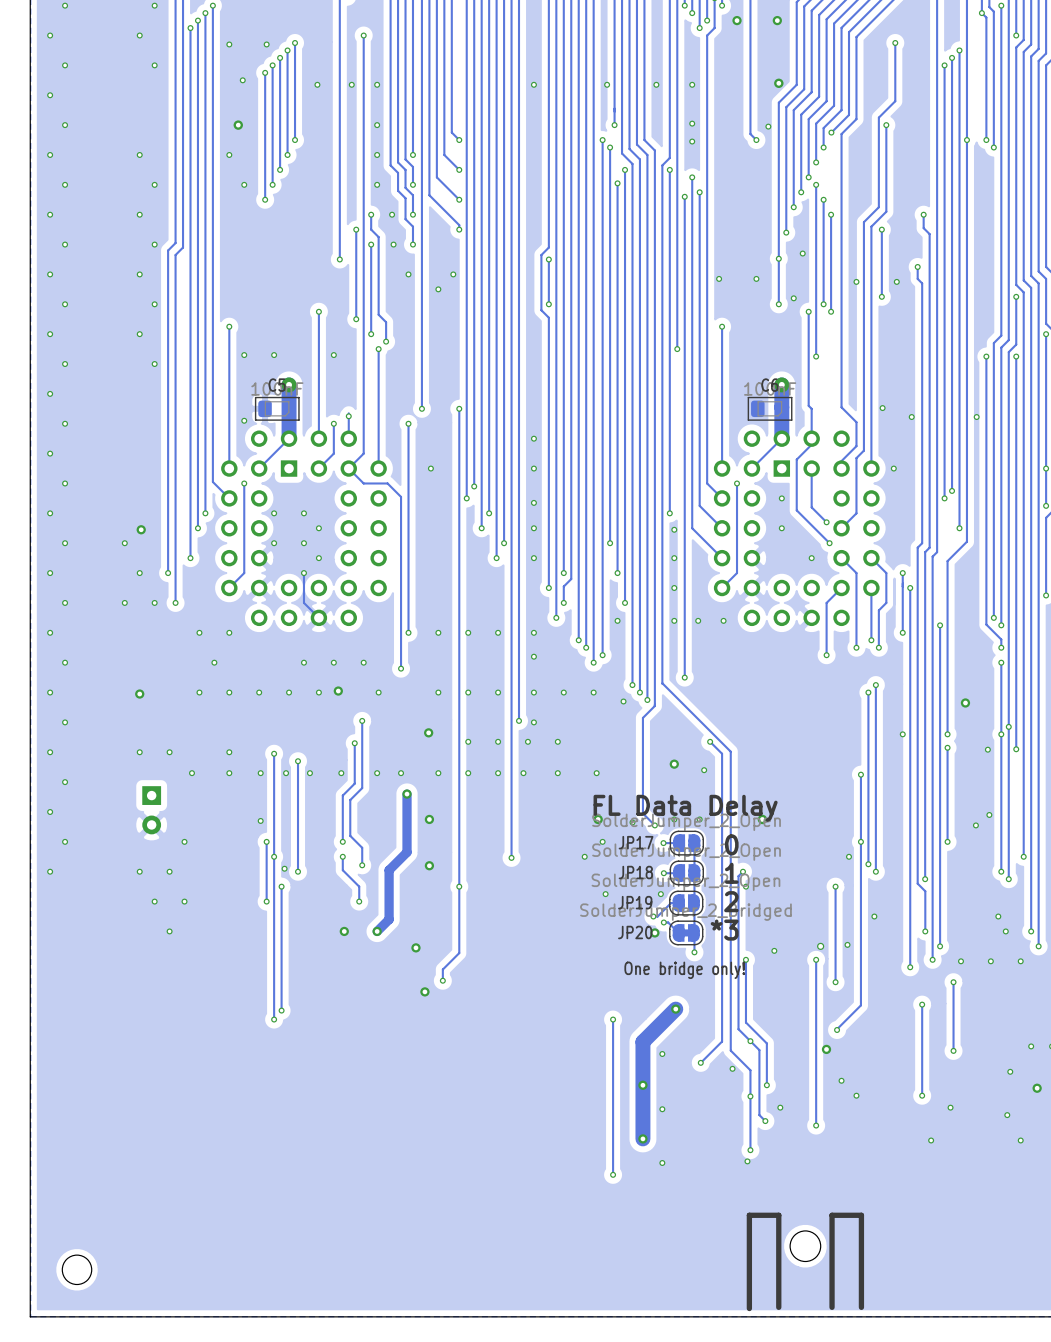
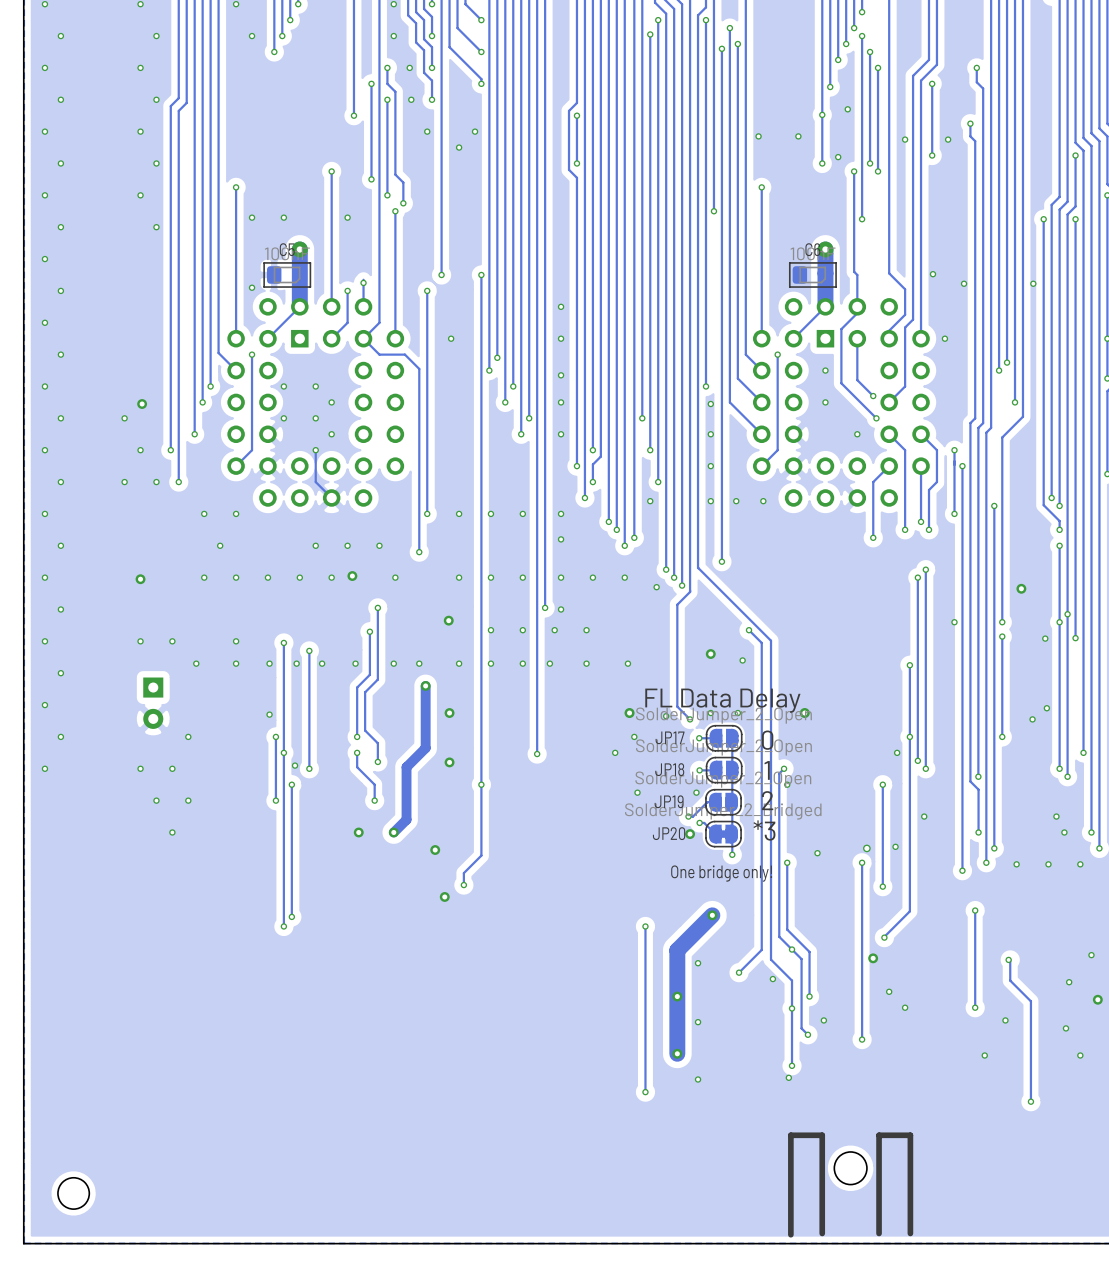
track: (953, 982) (953, 1050) -> none
via: (953, 982) -> none
track: none -> (1010, 959) (1010, 980) (1030, 1001) (1030, 1101)
via: none -> (1030, 1101)

